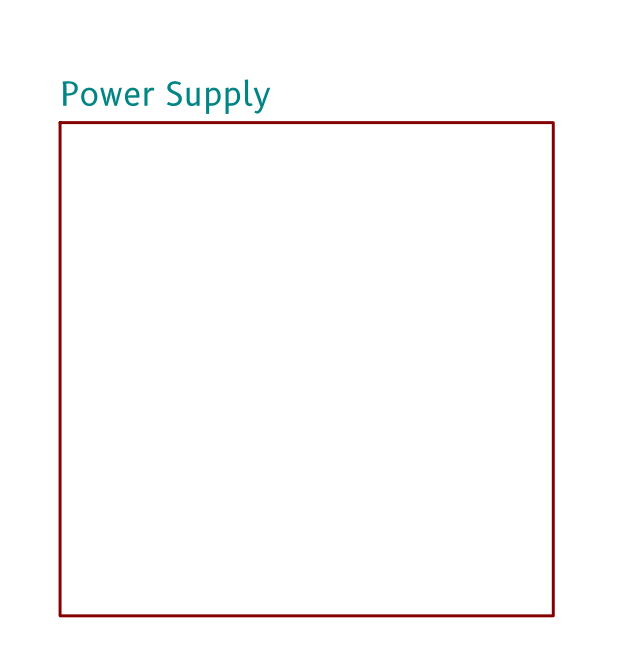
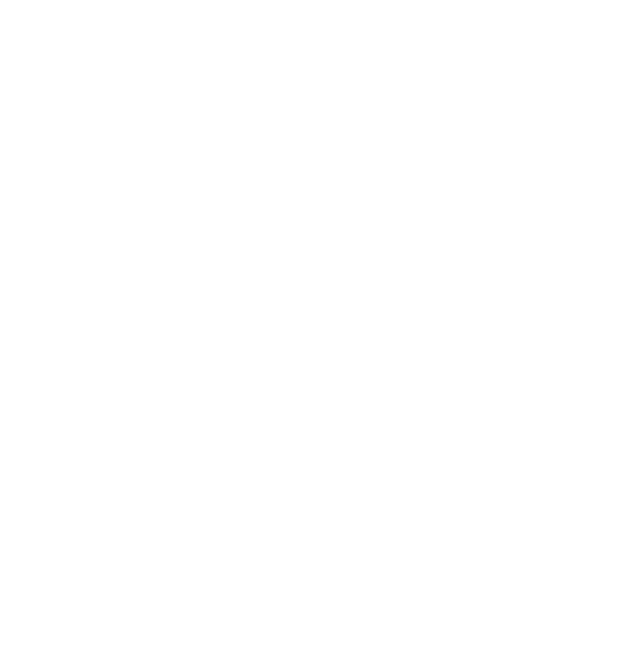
sheet Power Supply: (306, 369) -> none

